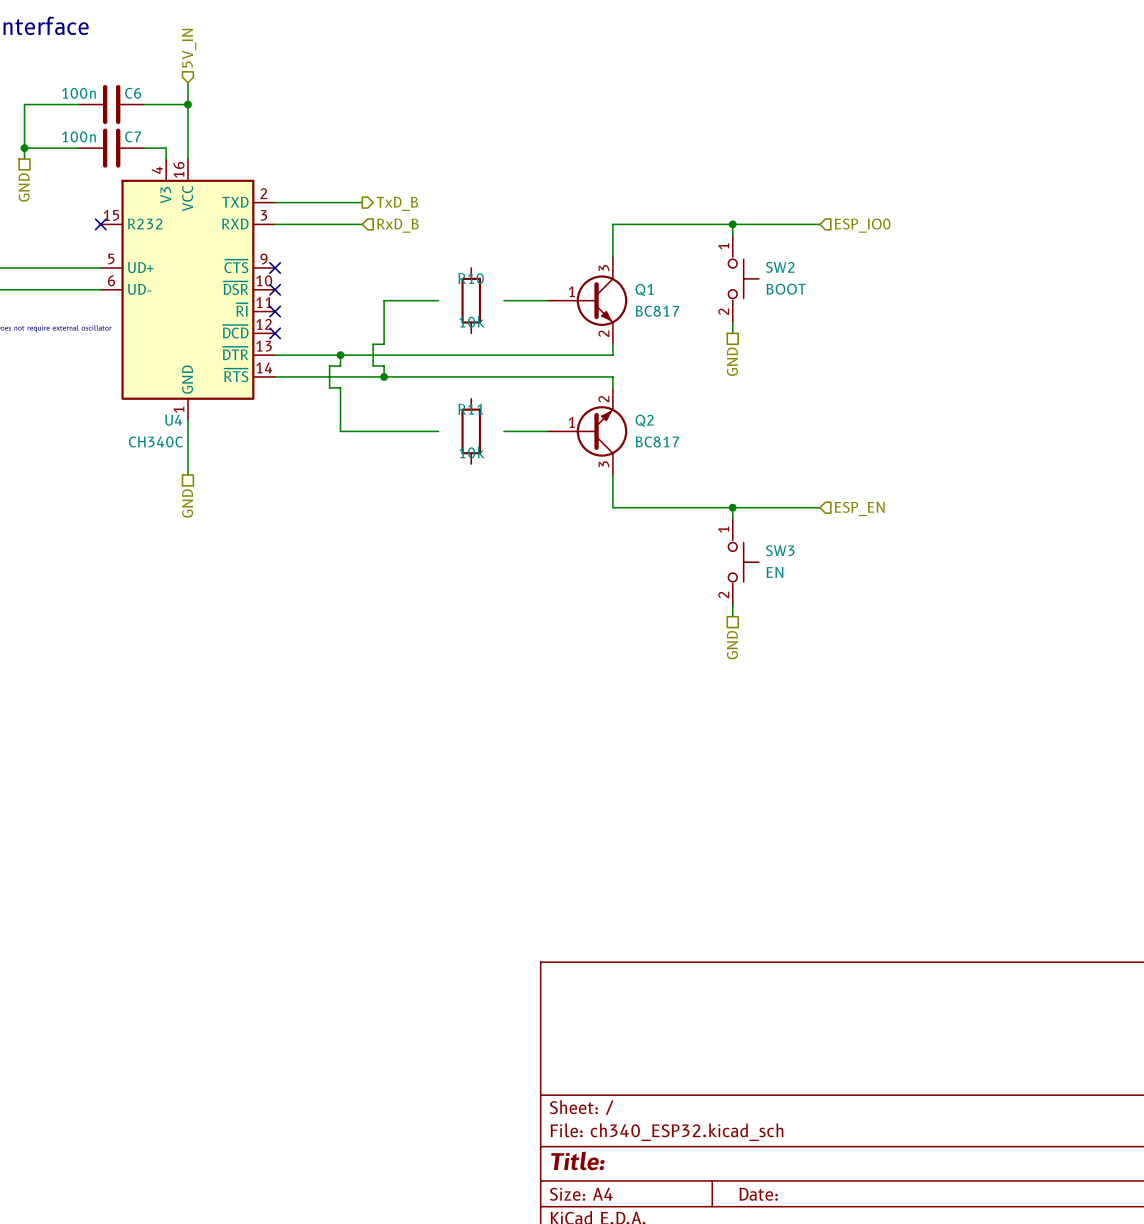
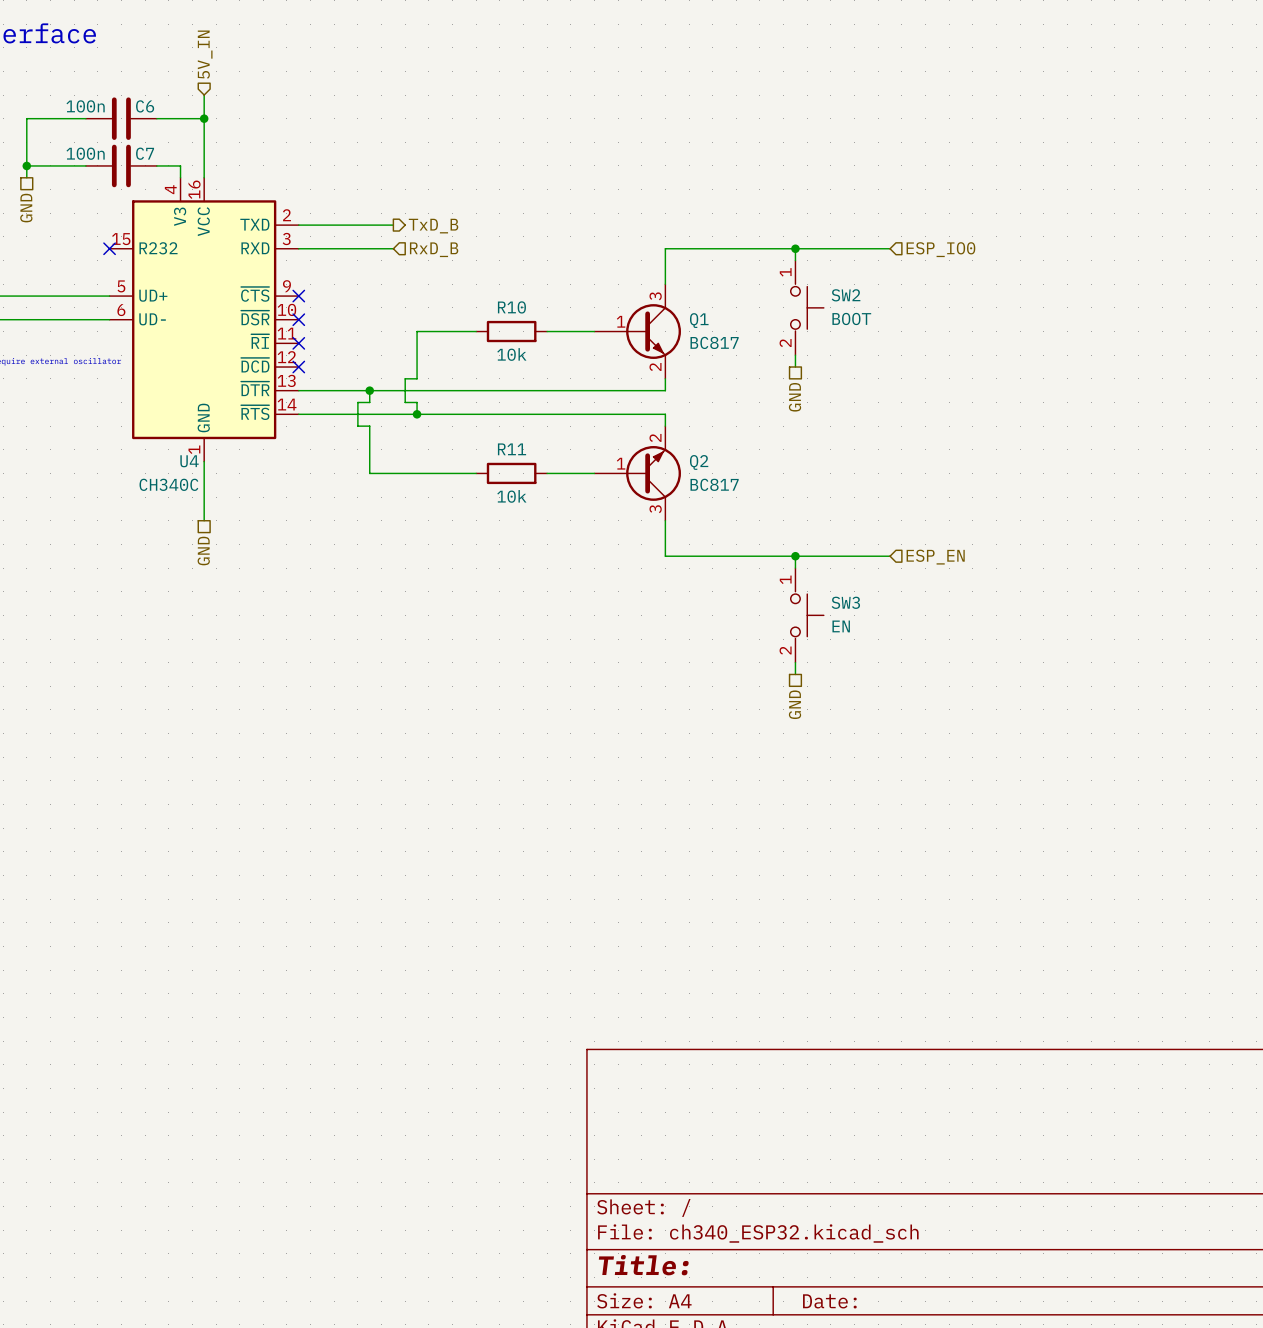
R10 rotation: 0° (471, 300) -> 90° clockwise (511, 331)
R11 rotation: 0° (471, 431) -> 90° clockwise (511, 473)

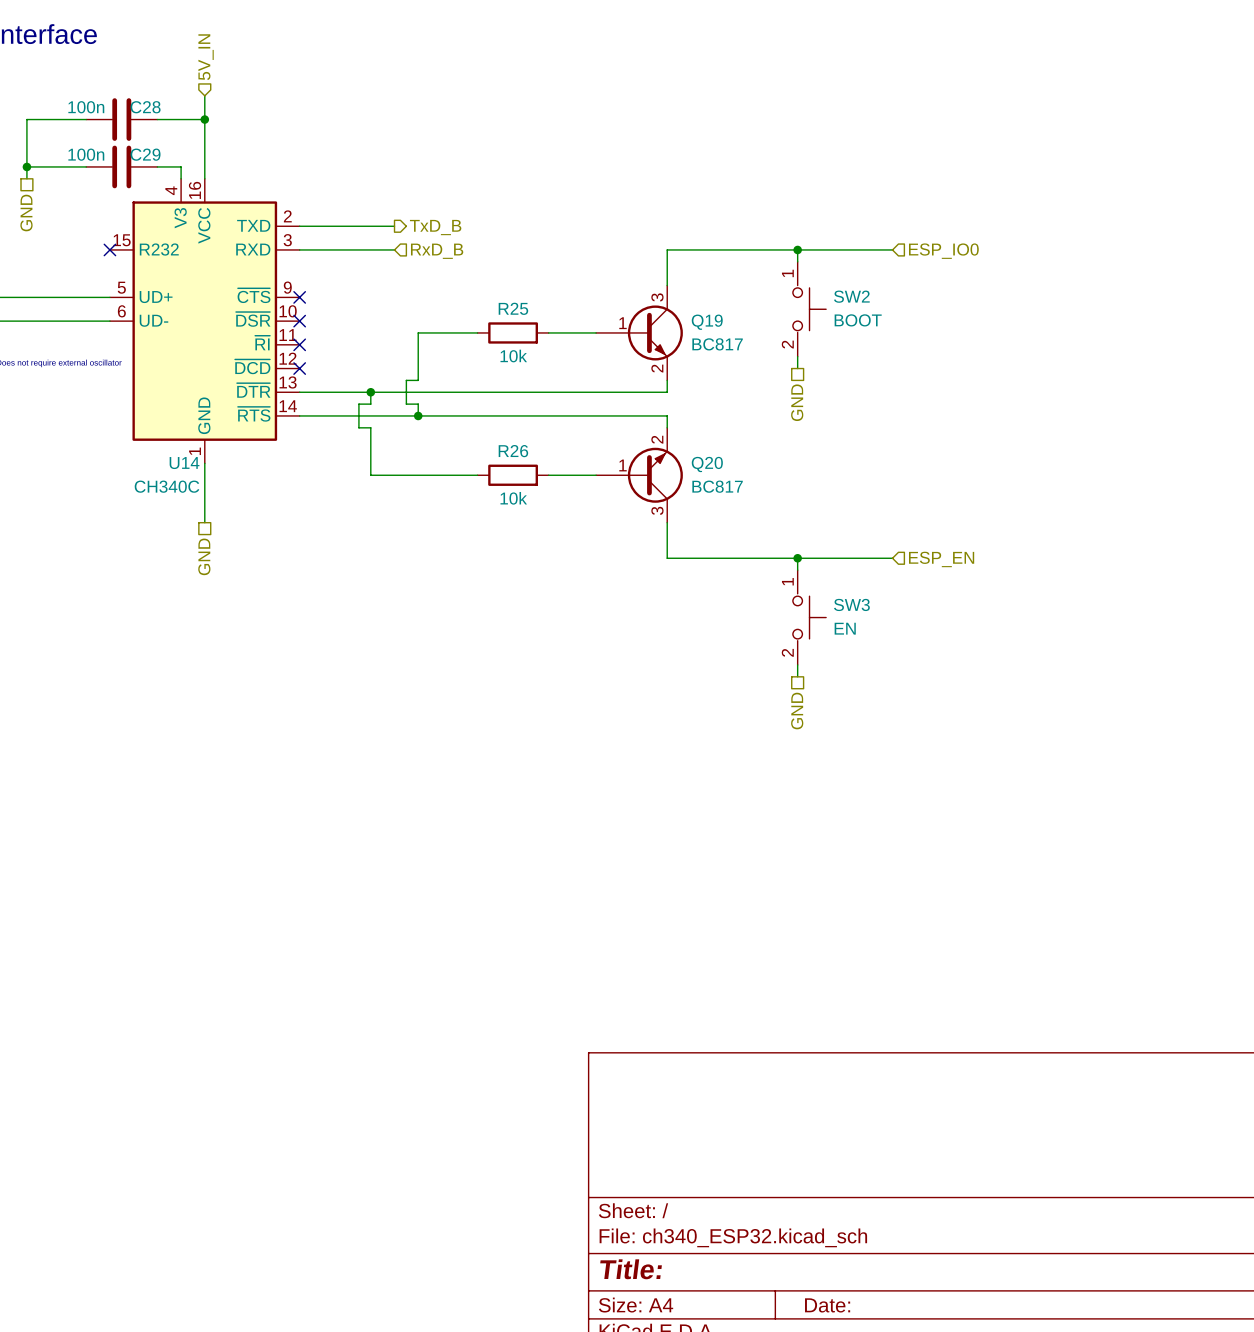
C6 name: C6 (145, 106) -> C28 (145, 107)
C7 name: C7 (145, 153) -> C29 (145, 154)
R10 name: R10 (511, 307) -> R25 (513, 308)
Q1 name: Q1 (699, 320) -> Q19 (707, 322)
R11 name: R11 (512, 449) -> R26 (513, 451)
U4 name: U4 (189, 461) -> U14 (184, 463)
Q2 name: Q2 (699, 462) -> Q20 (707, 464)

